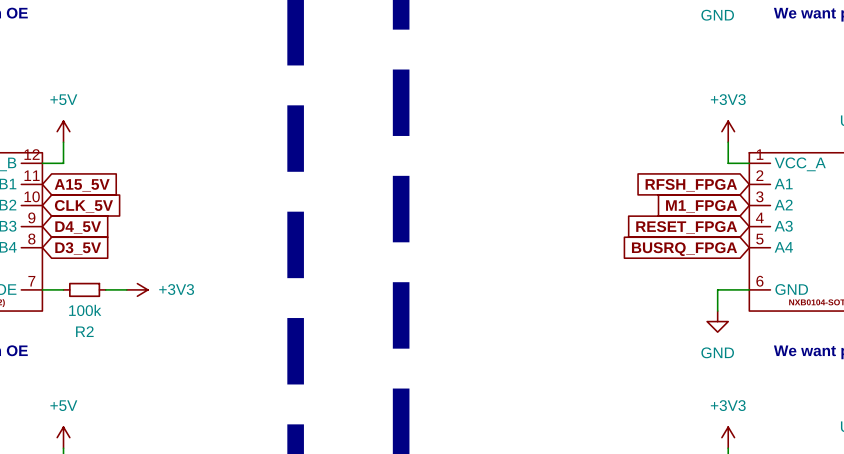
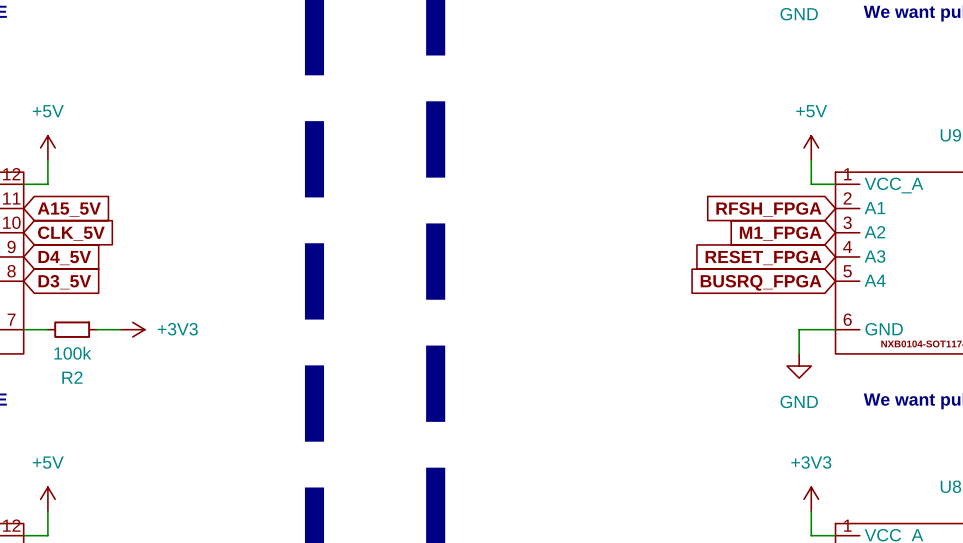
power symbol: +3V3 (728, 131) -> +5V (811, 147)

